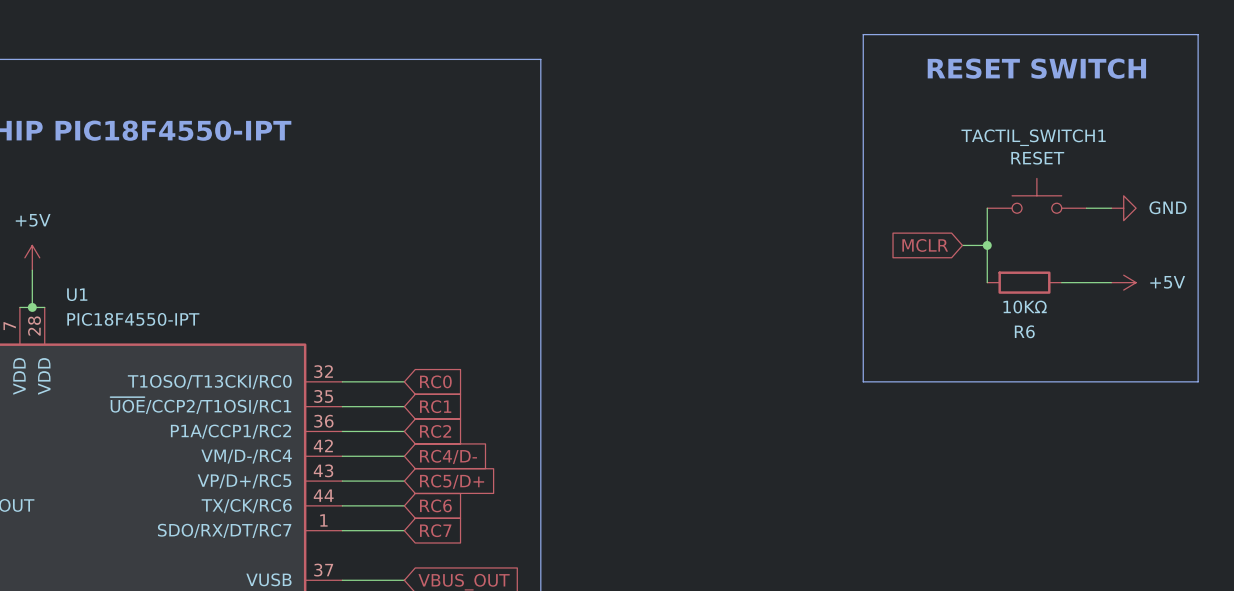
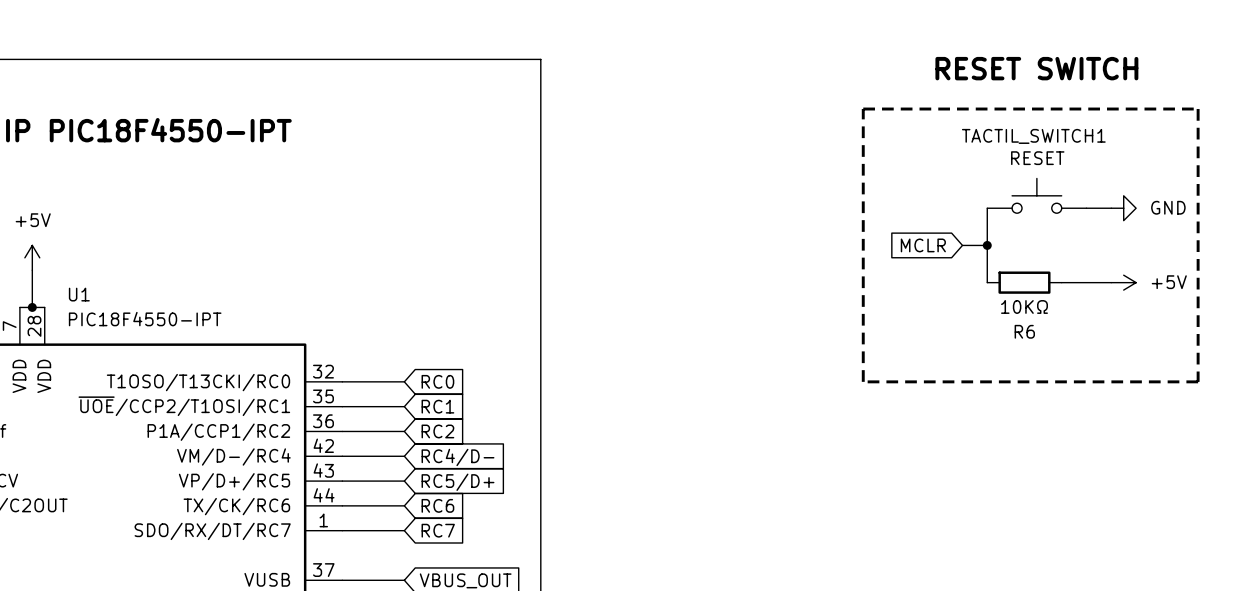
line: (863, 34) (1198, 34) (1198, 381) (863, 381) (863, 34) -> (863, 109) (863, 381) (1198, 381) (1198, 109) (863, 109)

